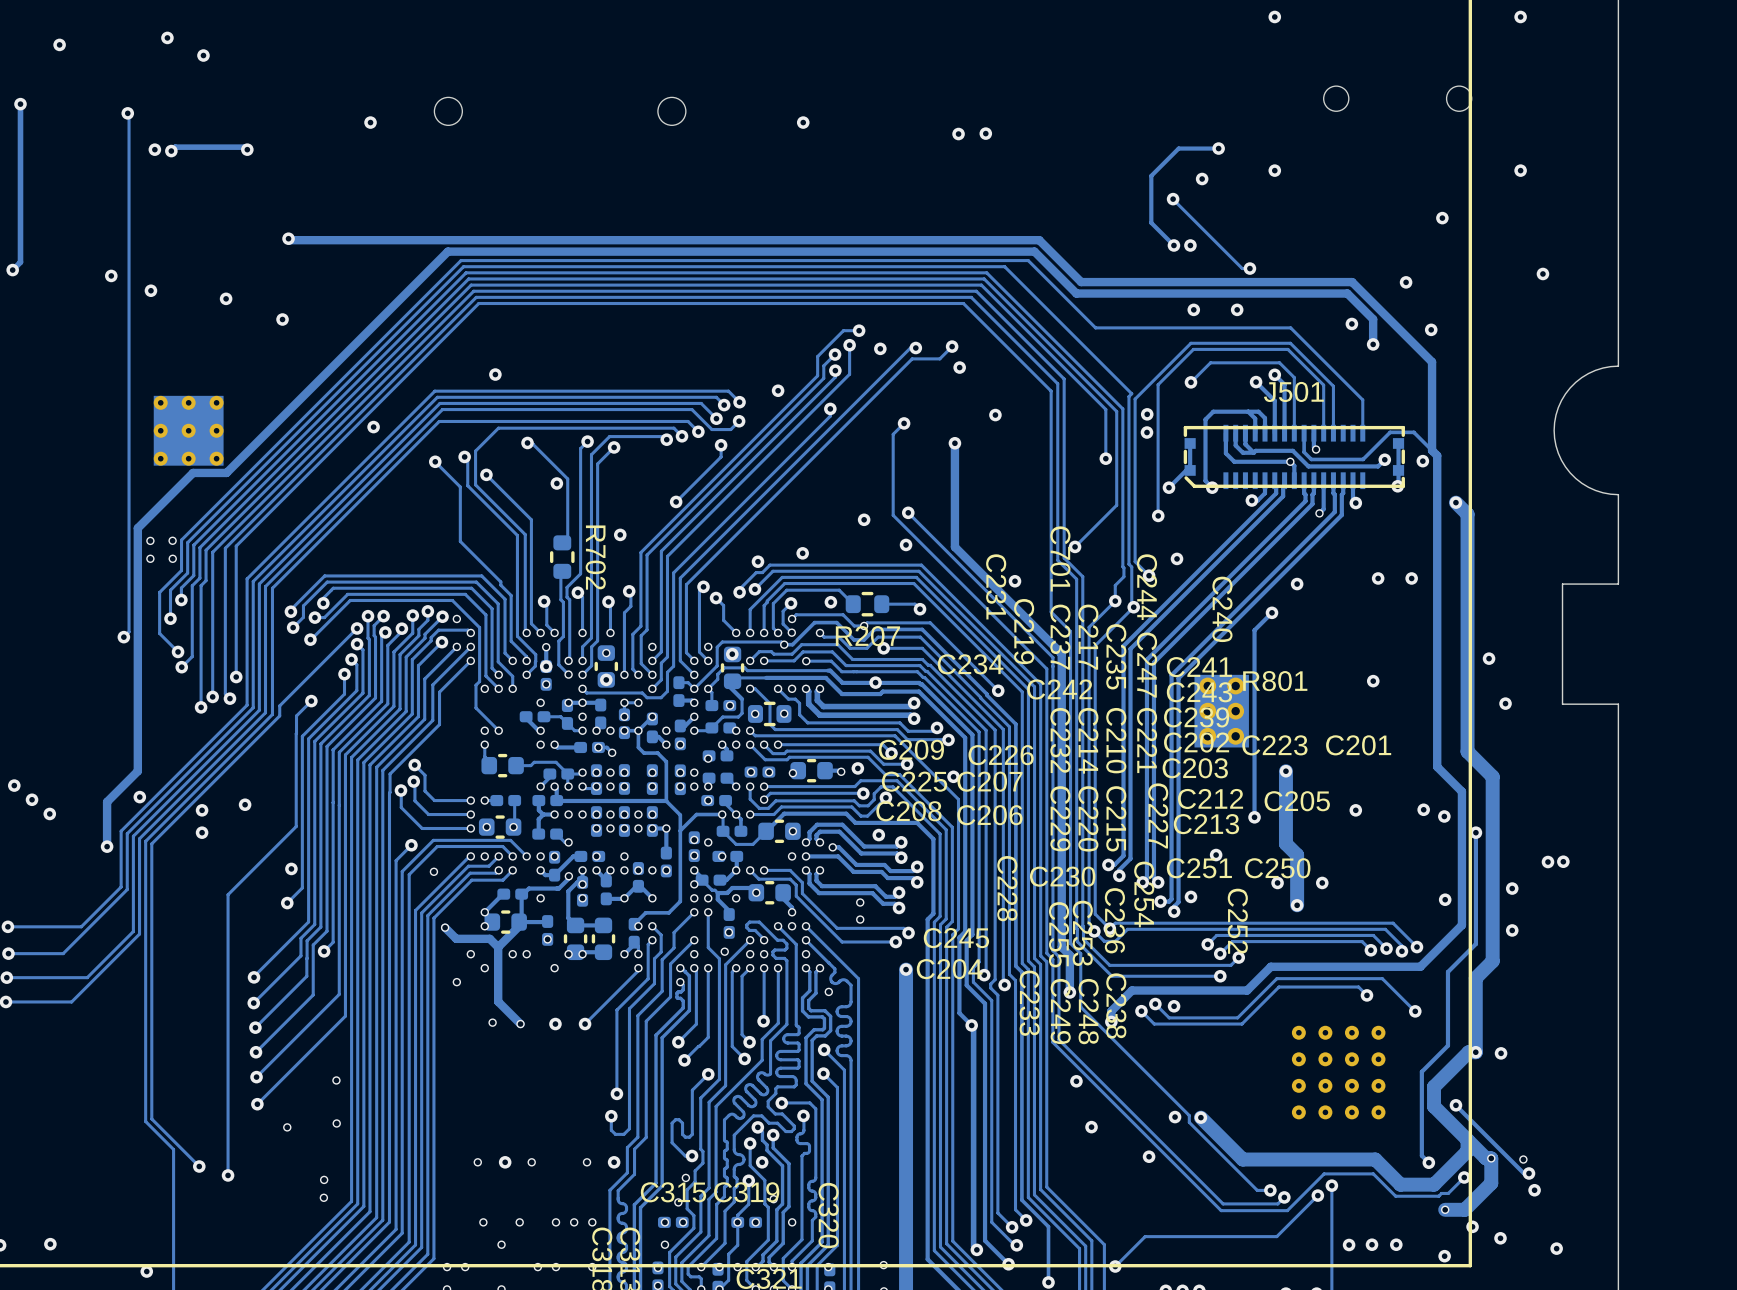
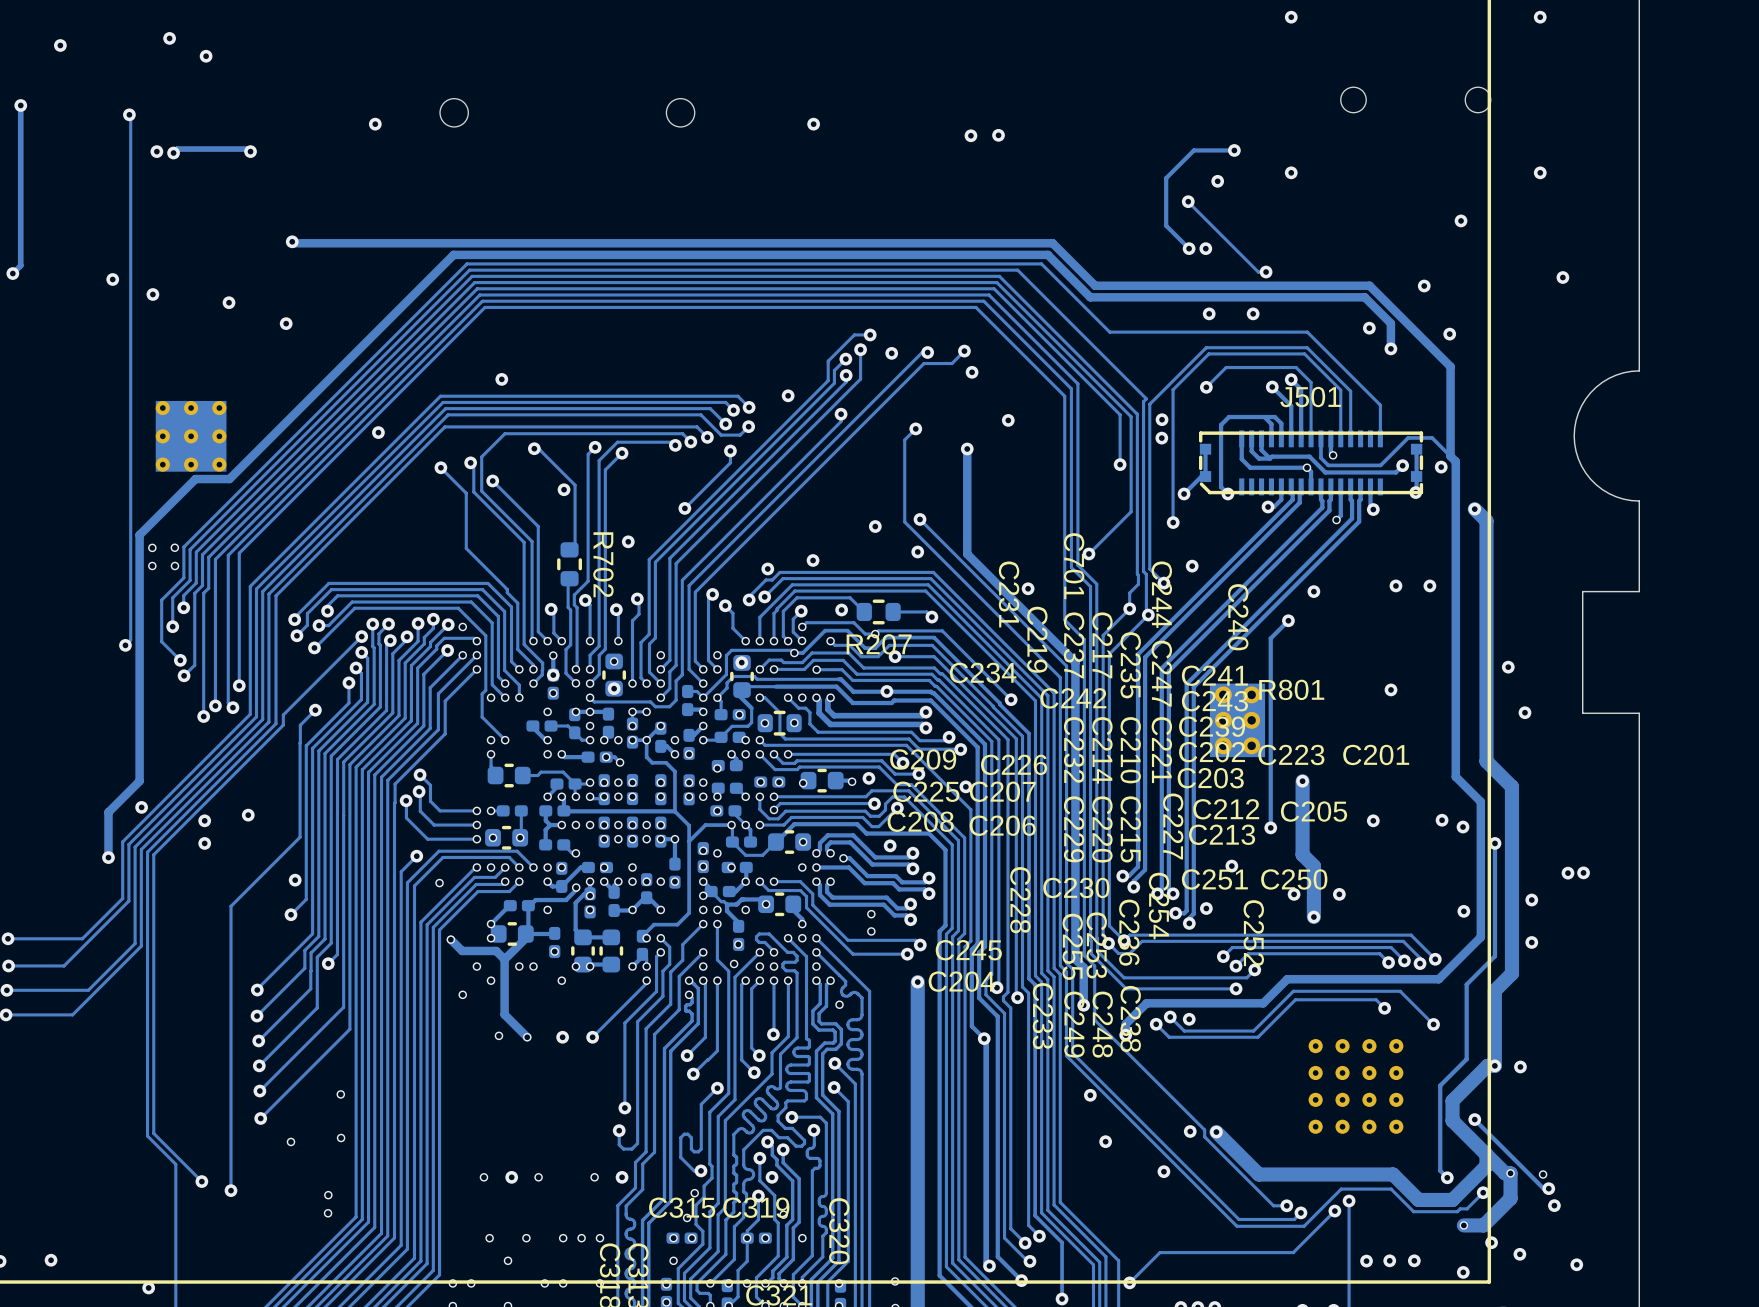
via: (14, 785) -> none
via: (32, 799) -> none
via: (49, 813) -> none

